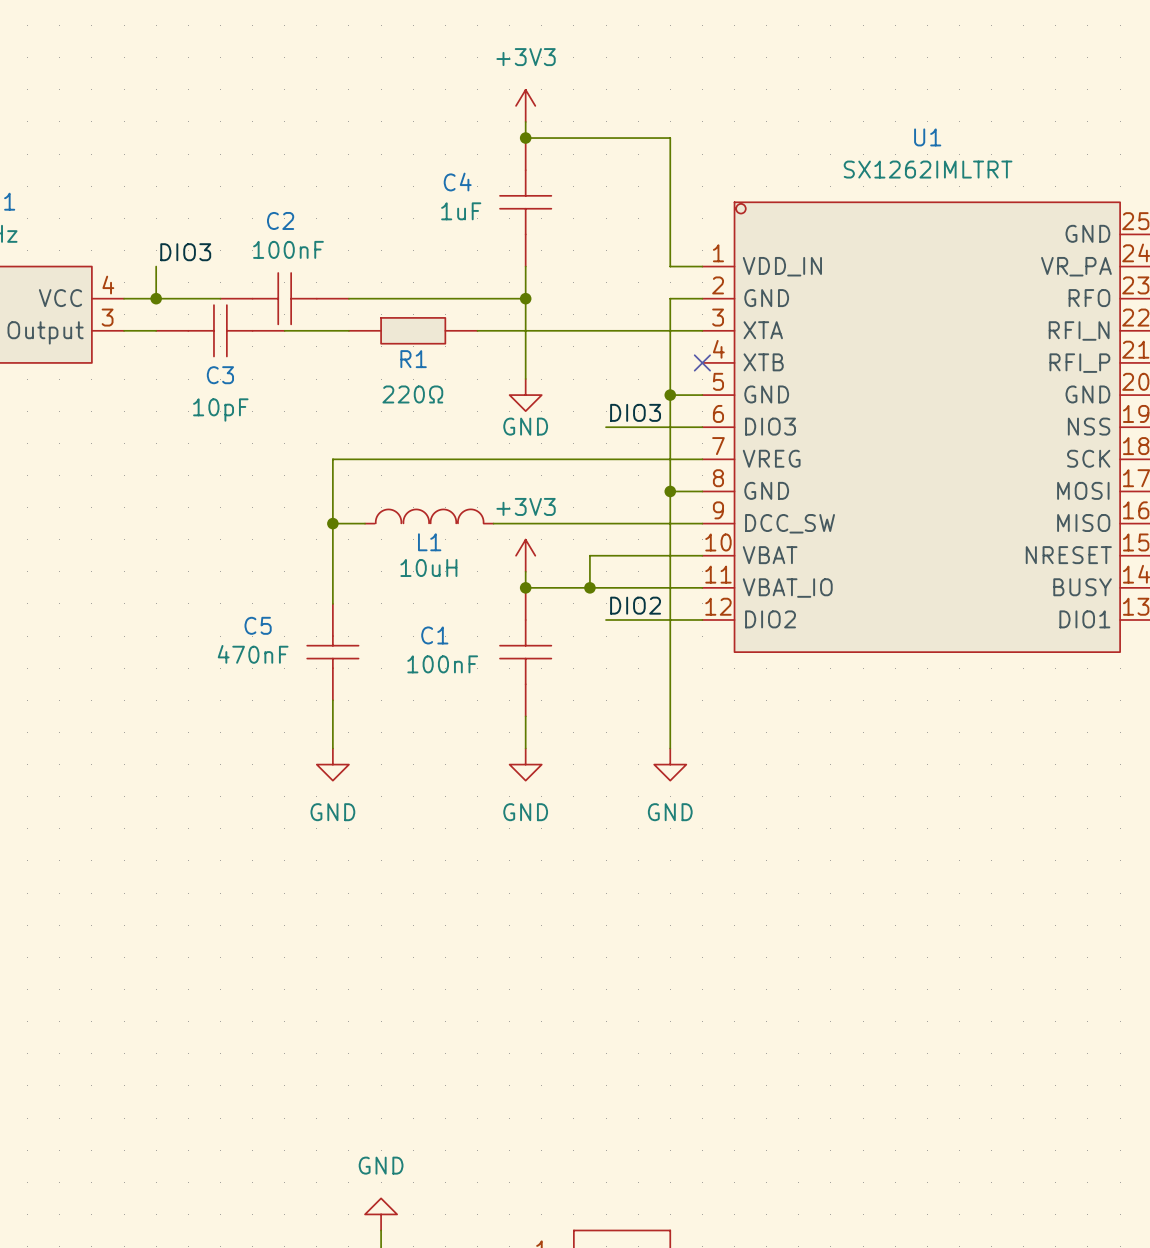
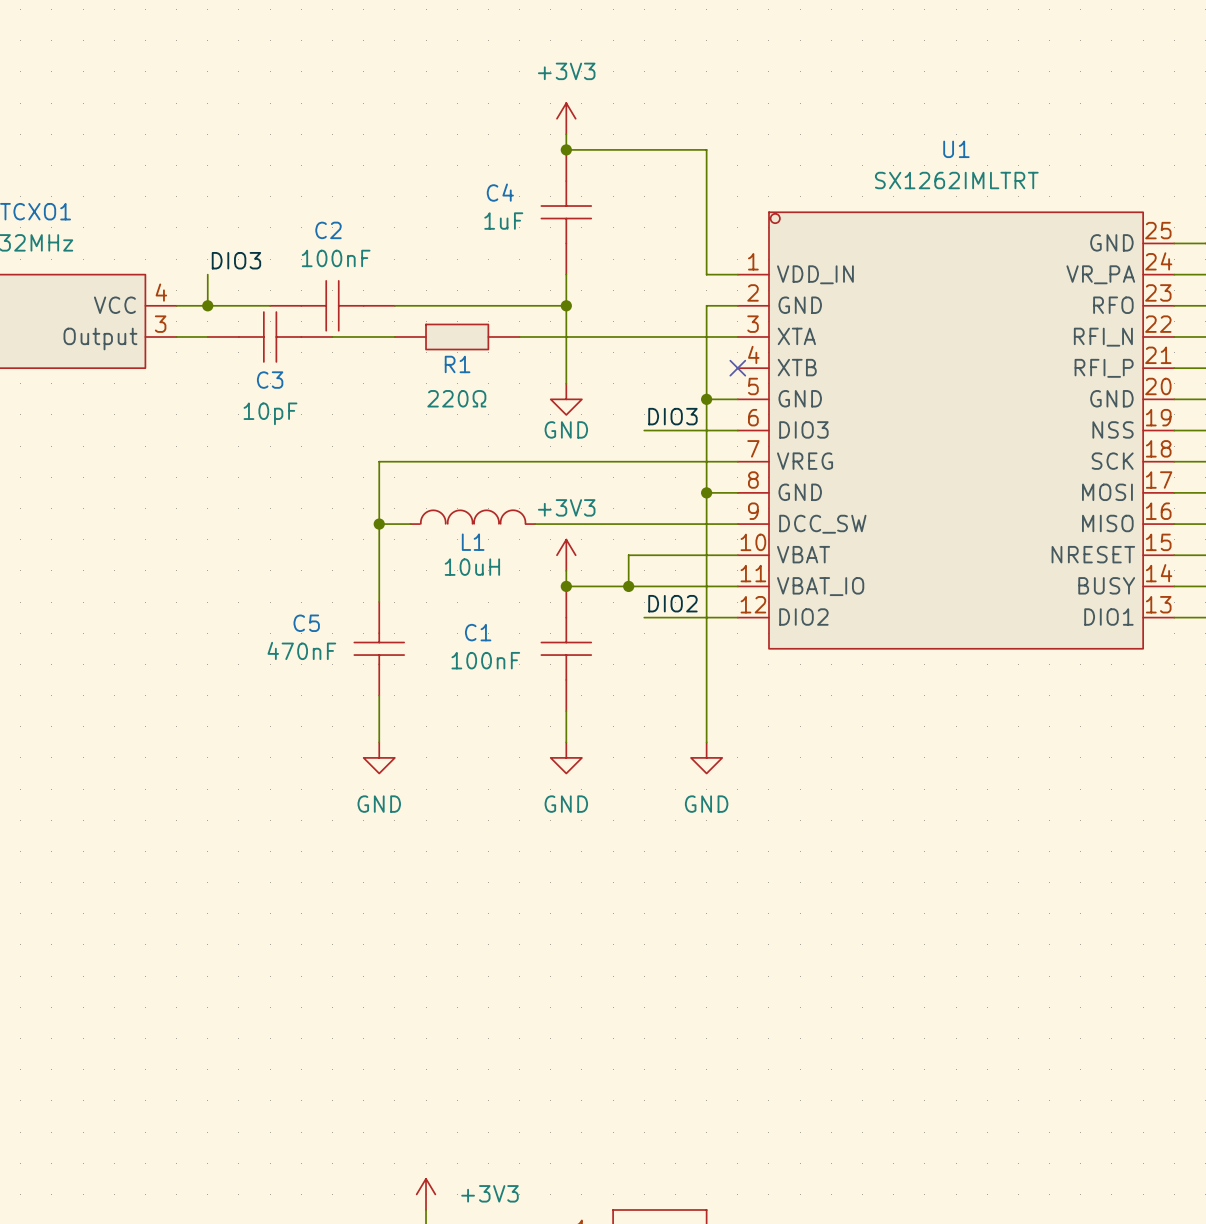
power symbol: GND (381, 1214) -> +3V3 (426, 1194)

